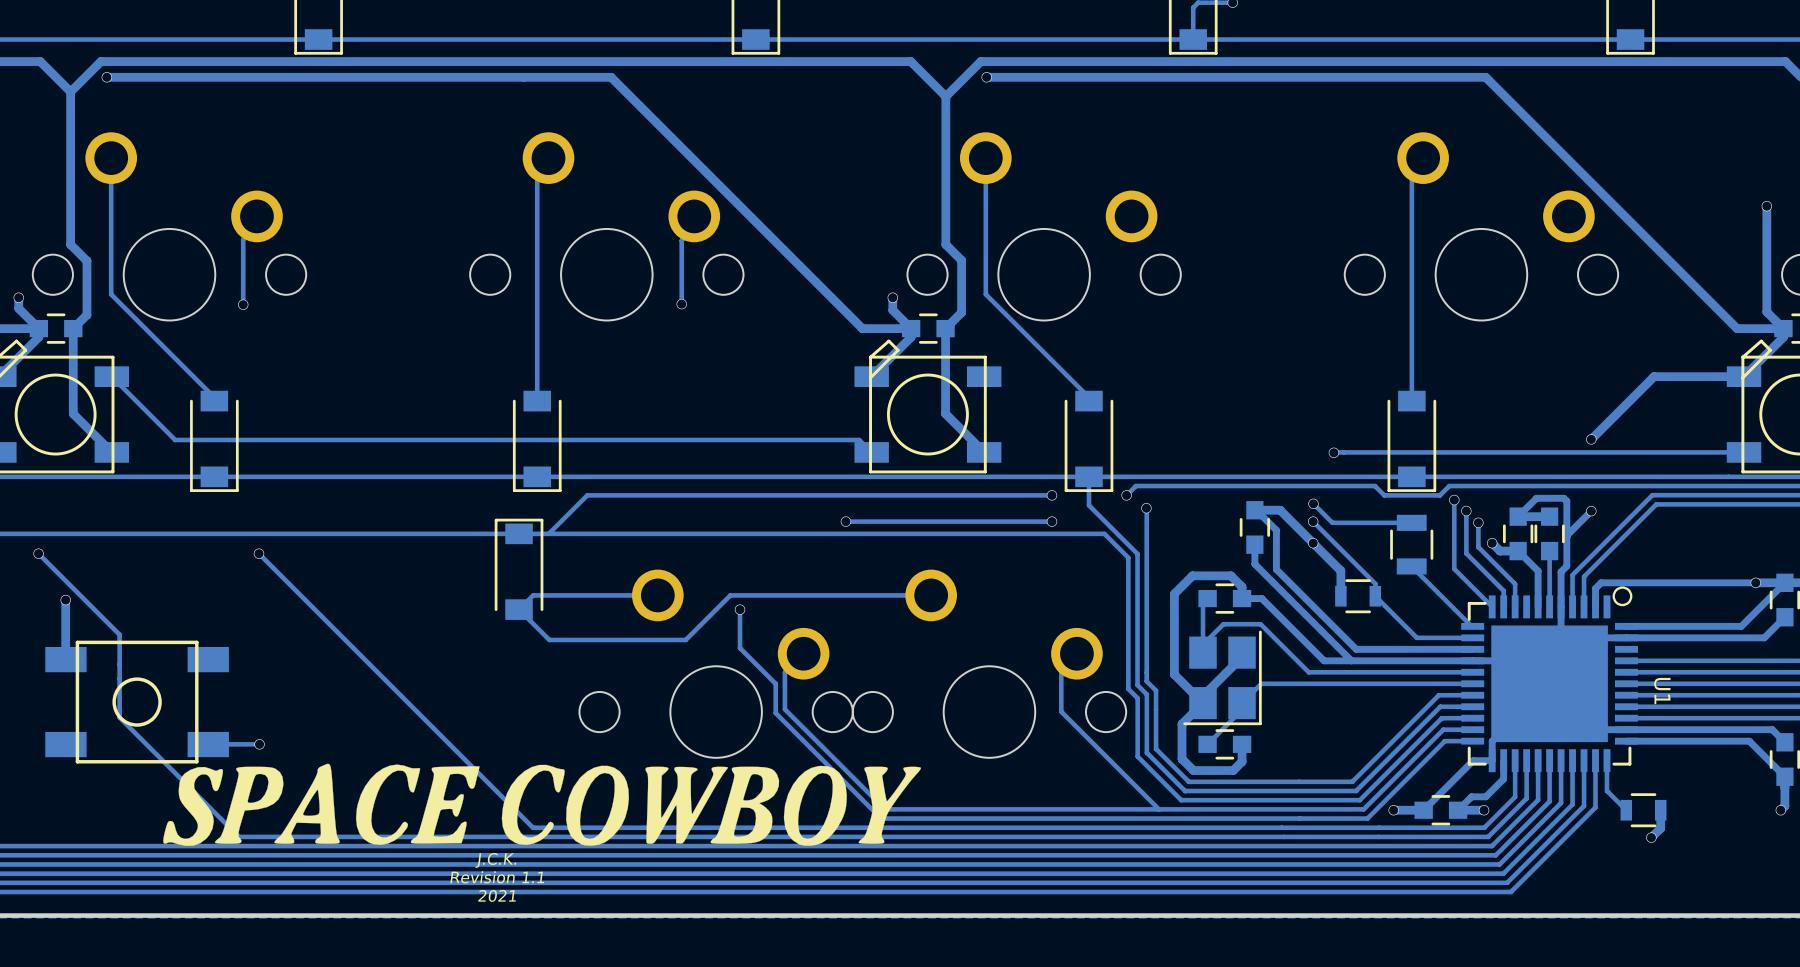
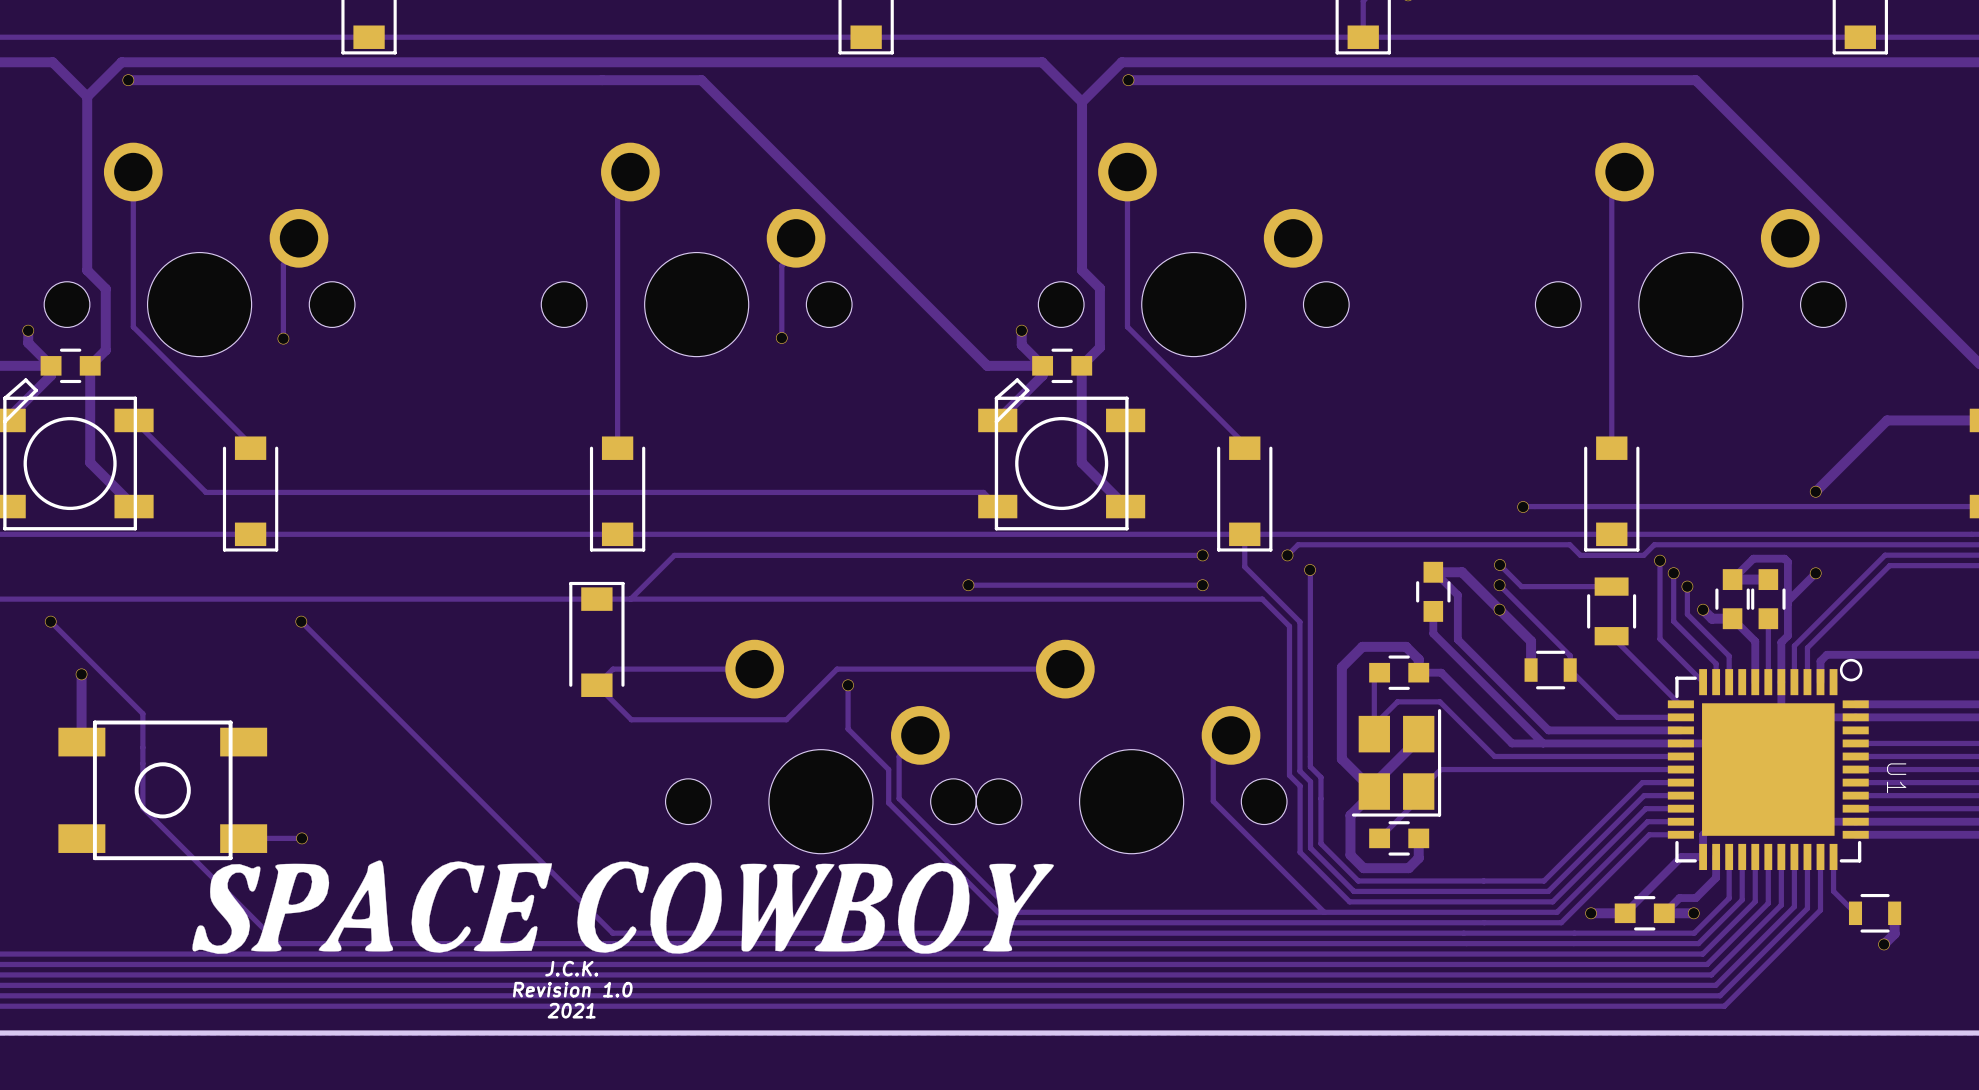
text: Revision 1.1 (497, 877) -> Revision 1.0 (572, 989)

